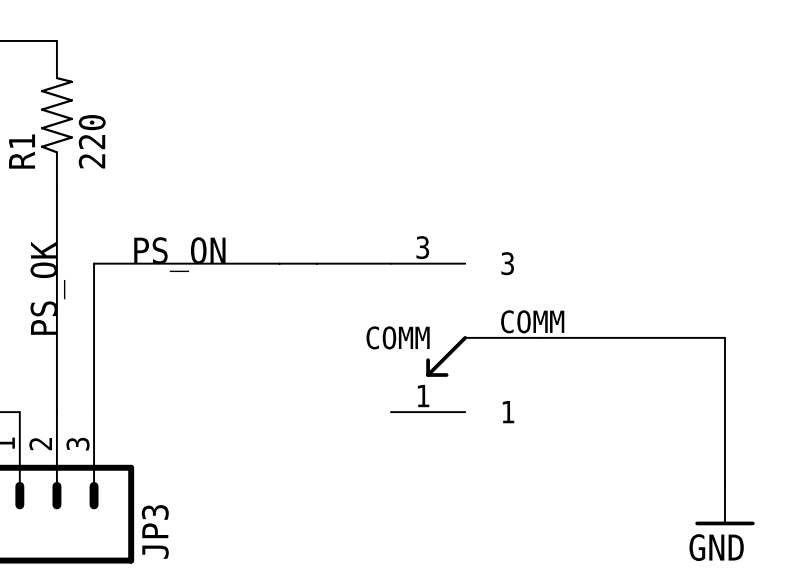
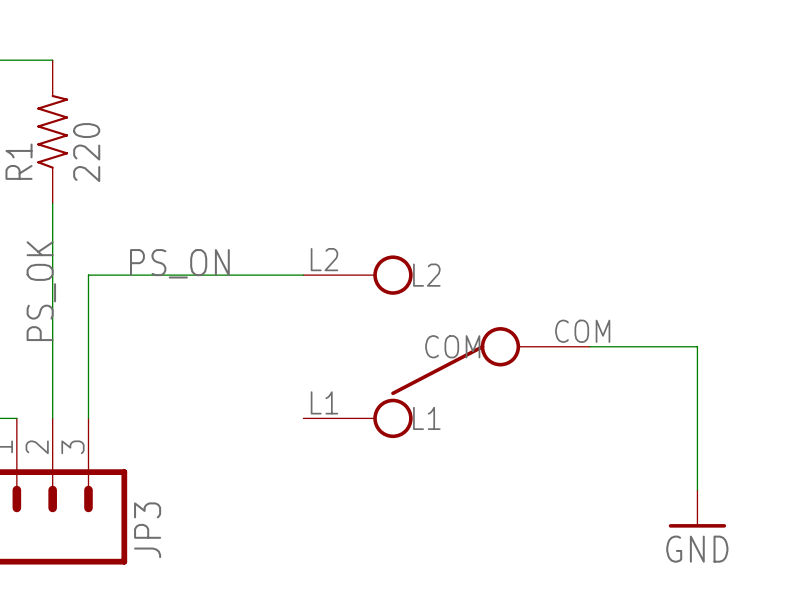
part symbol: [390, 263, 540, 413] -> [303, 255, 590, 439]

